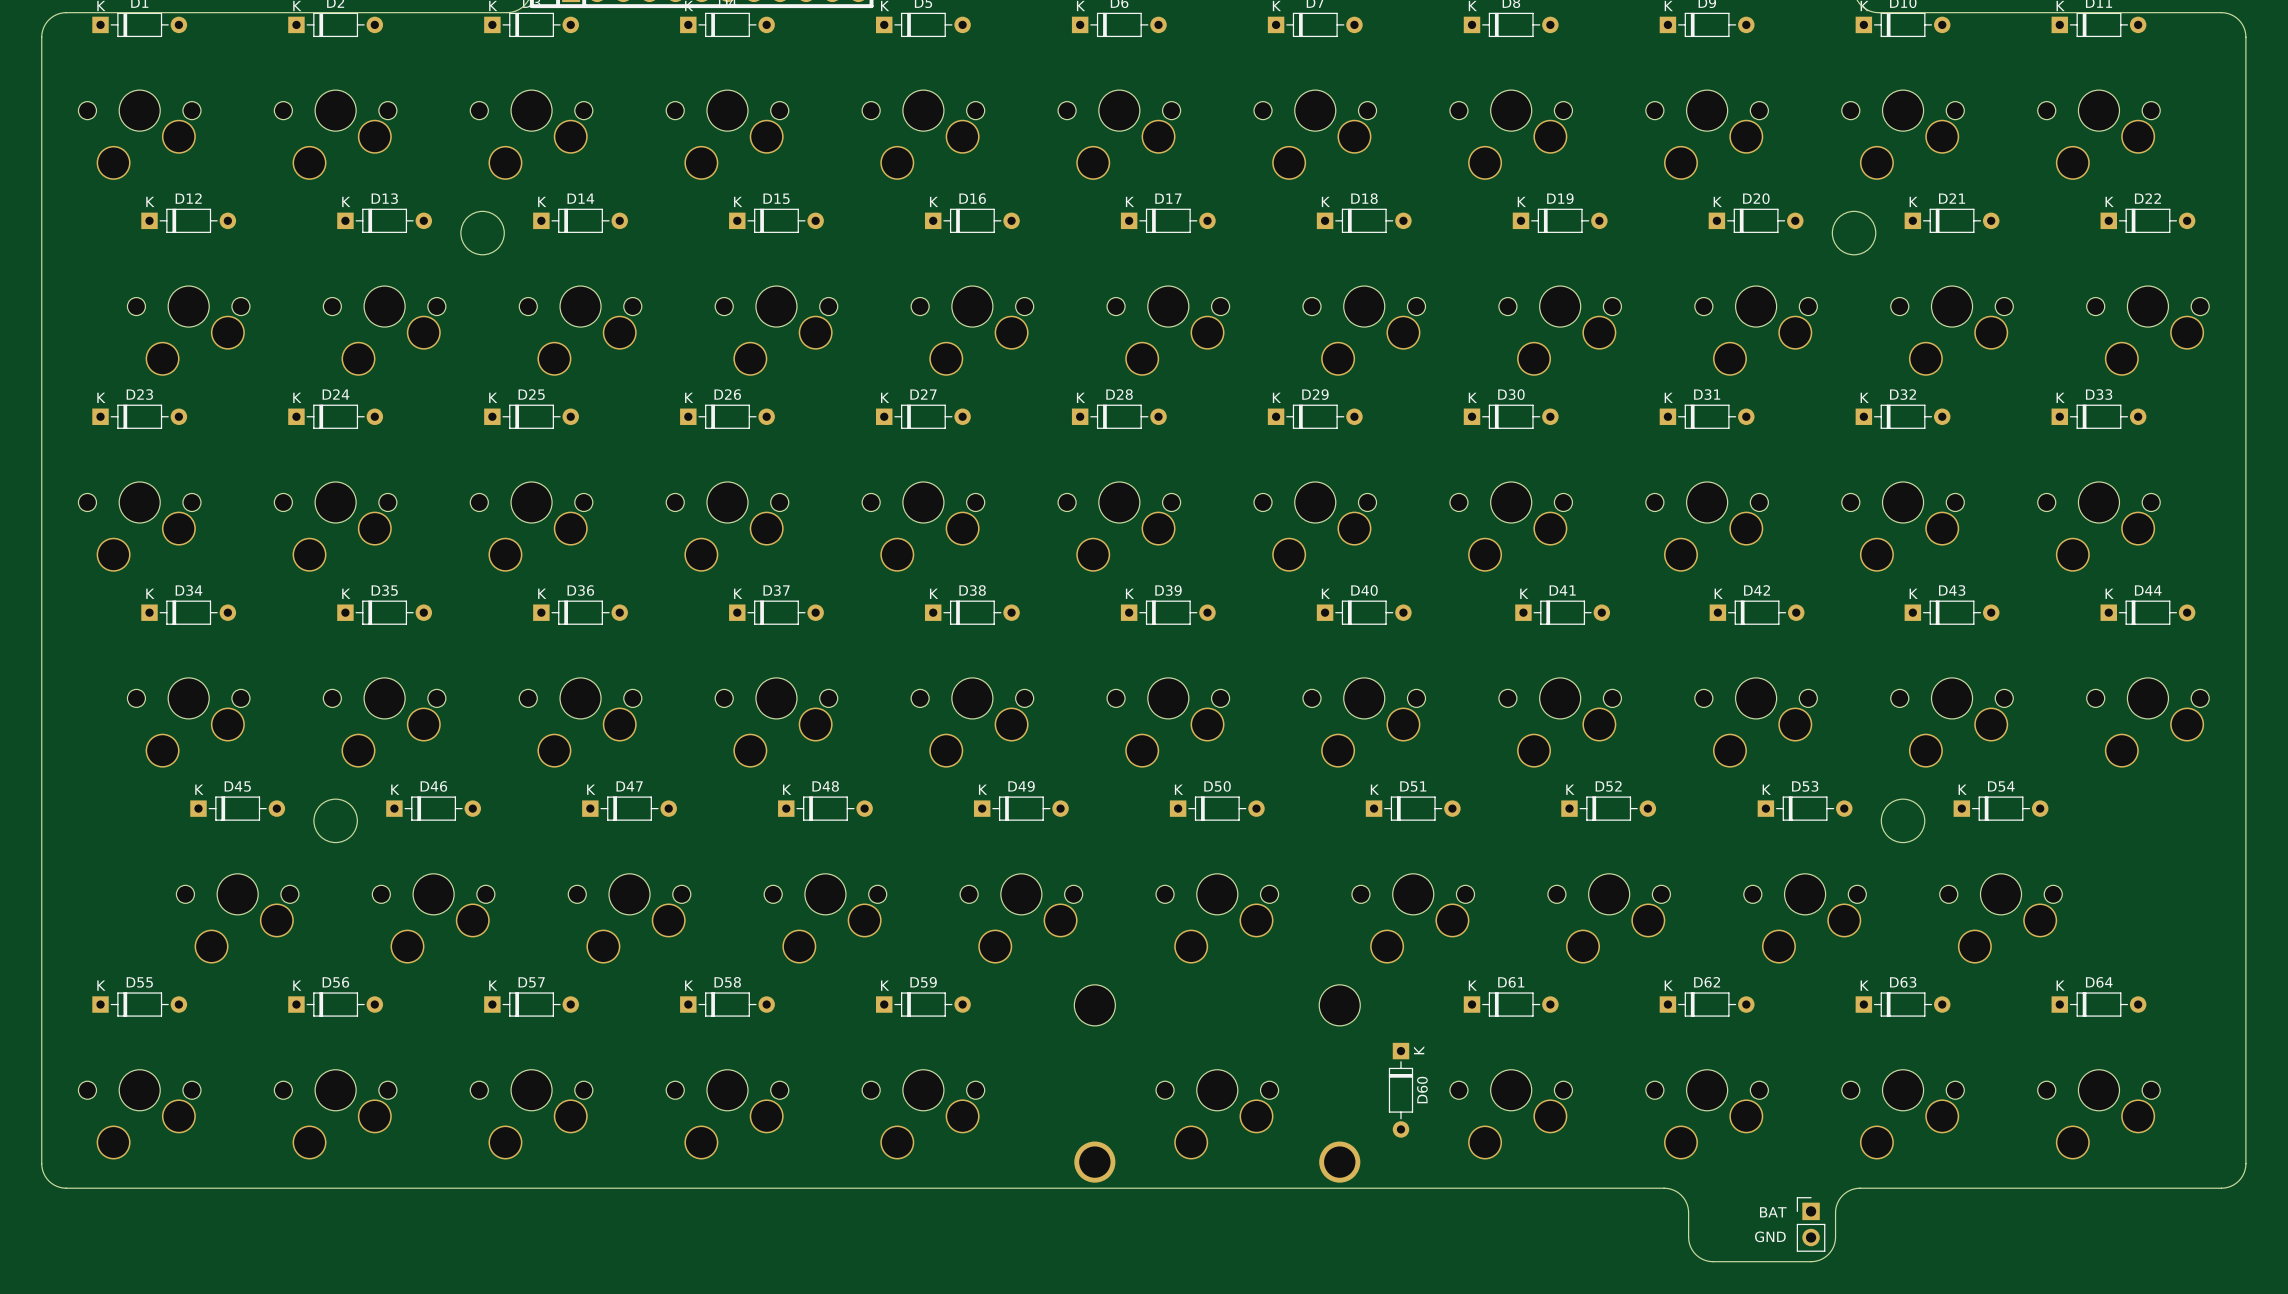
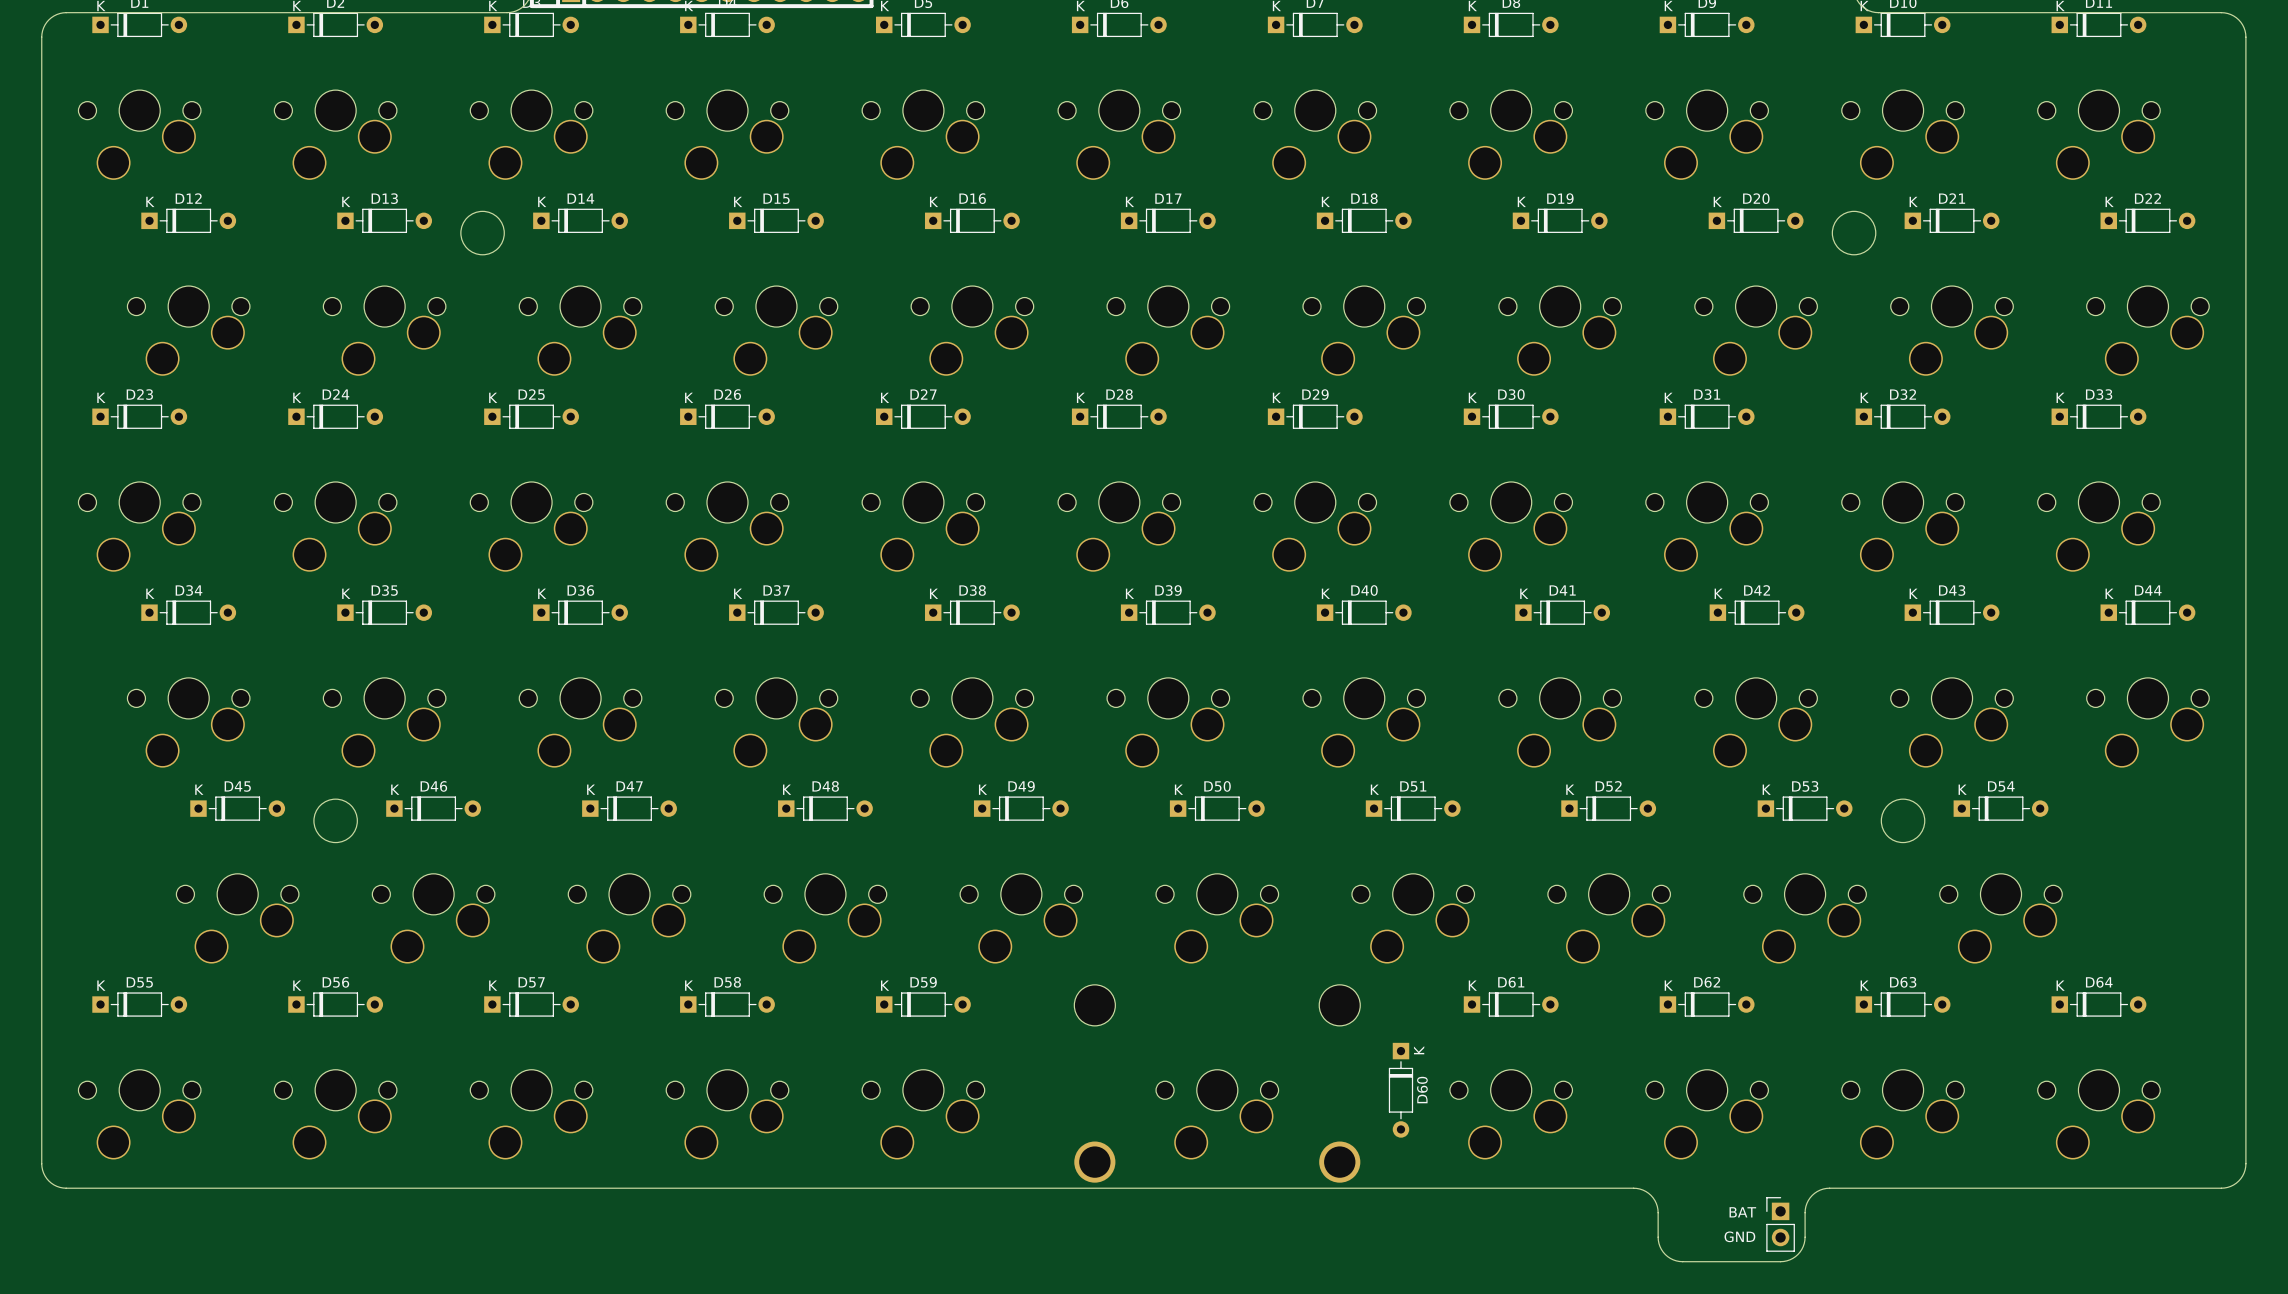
board edge: (1633, 1188) (1666, 1188) (1681, 1195) (1687, 1207) (1690, 1246) (1698, 1256) (1713, 1261) -> (1633, 1188) (1645, 1191) (1656, 1203) (1658, 1240) (1665, 1254) (1679, 1261) (1713, 1261)
board edge: (1860, 1188) (1847, 1191) (1837, 1203) (1835, 1240) (1828, 1254) (1814, 1261) (1780, 1261) -> (1860, 1188) (1826, 1188) (1812, 1195) (1805, 1209) (1803, 1246) (1792, 1258) (1780, 1261)
text position: BAT (1773, 1212) -> BAT (1742, 1212)
part position: (1811, 1224) -> (1780, 1224)
text position: GND (1770, 1236) -> GND (1739, 1236)

